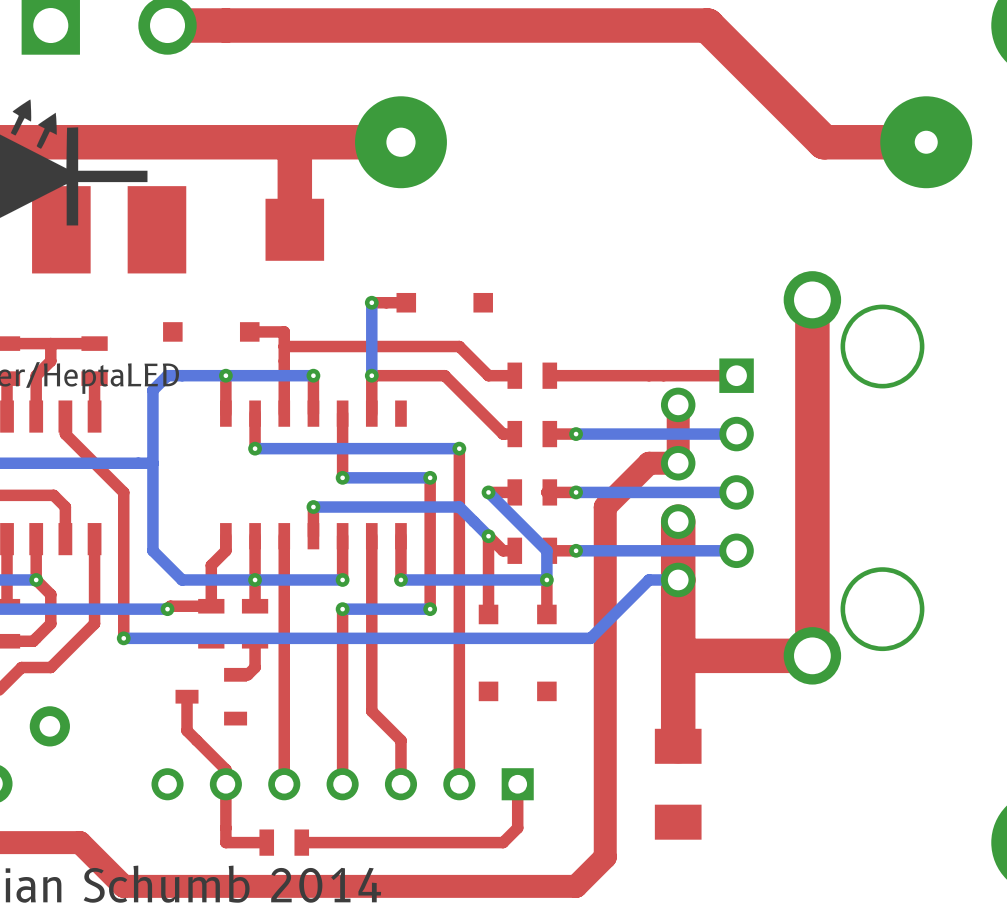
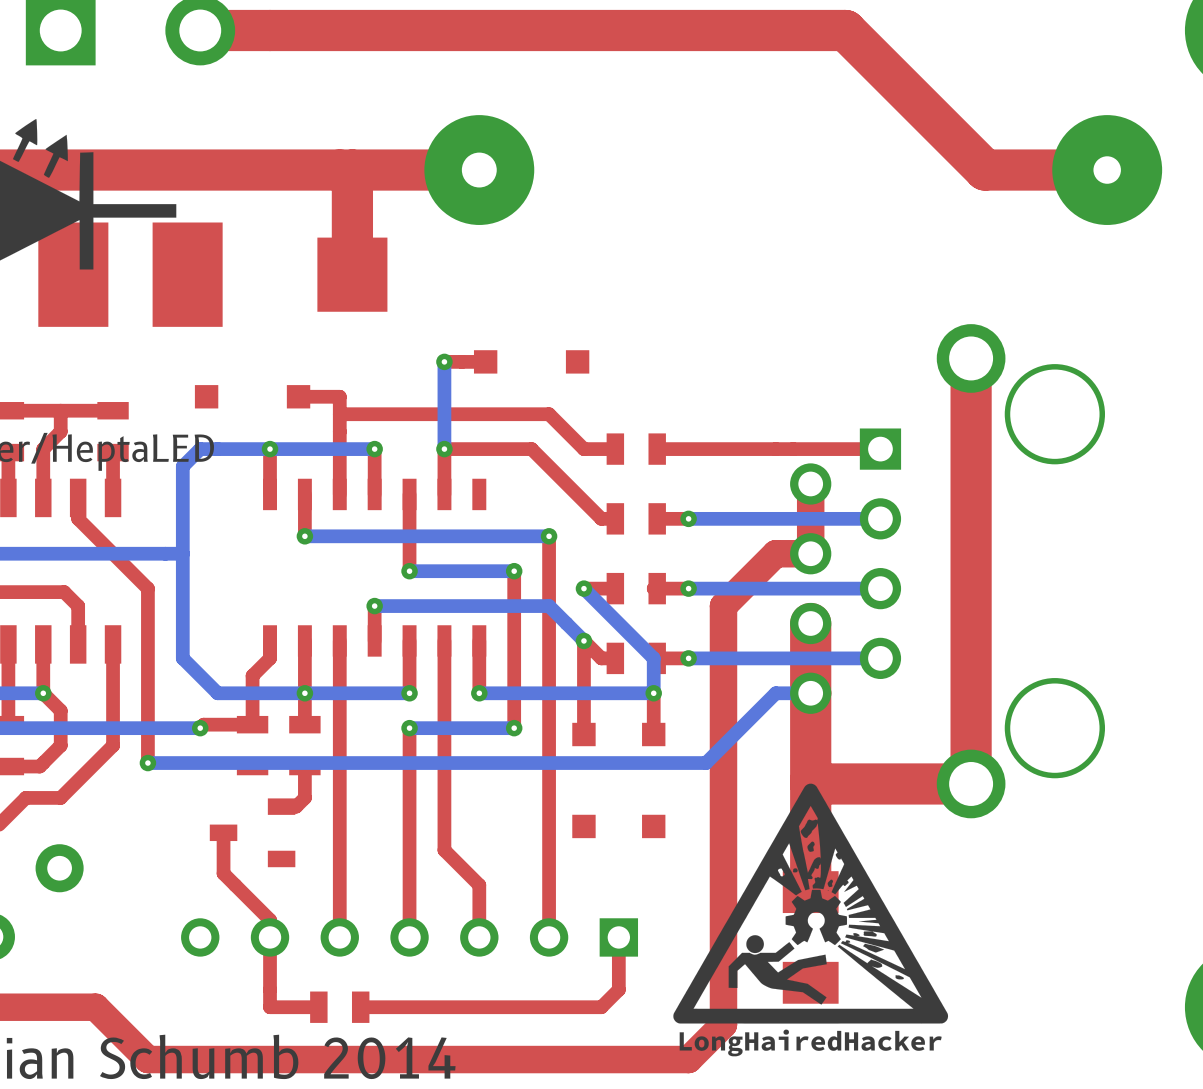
drawing: none -> [673, 783, 949, 1057]

